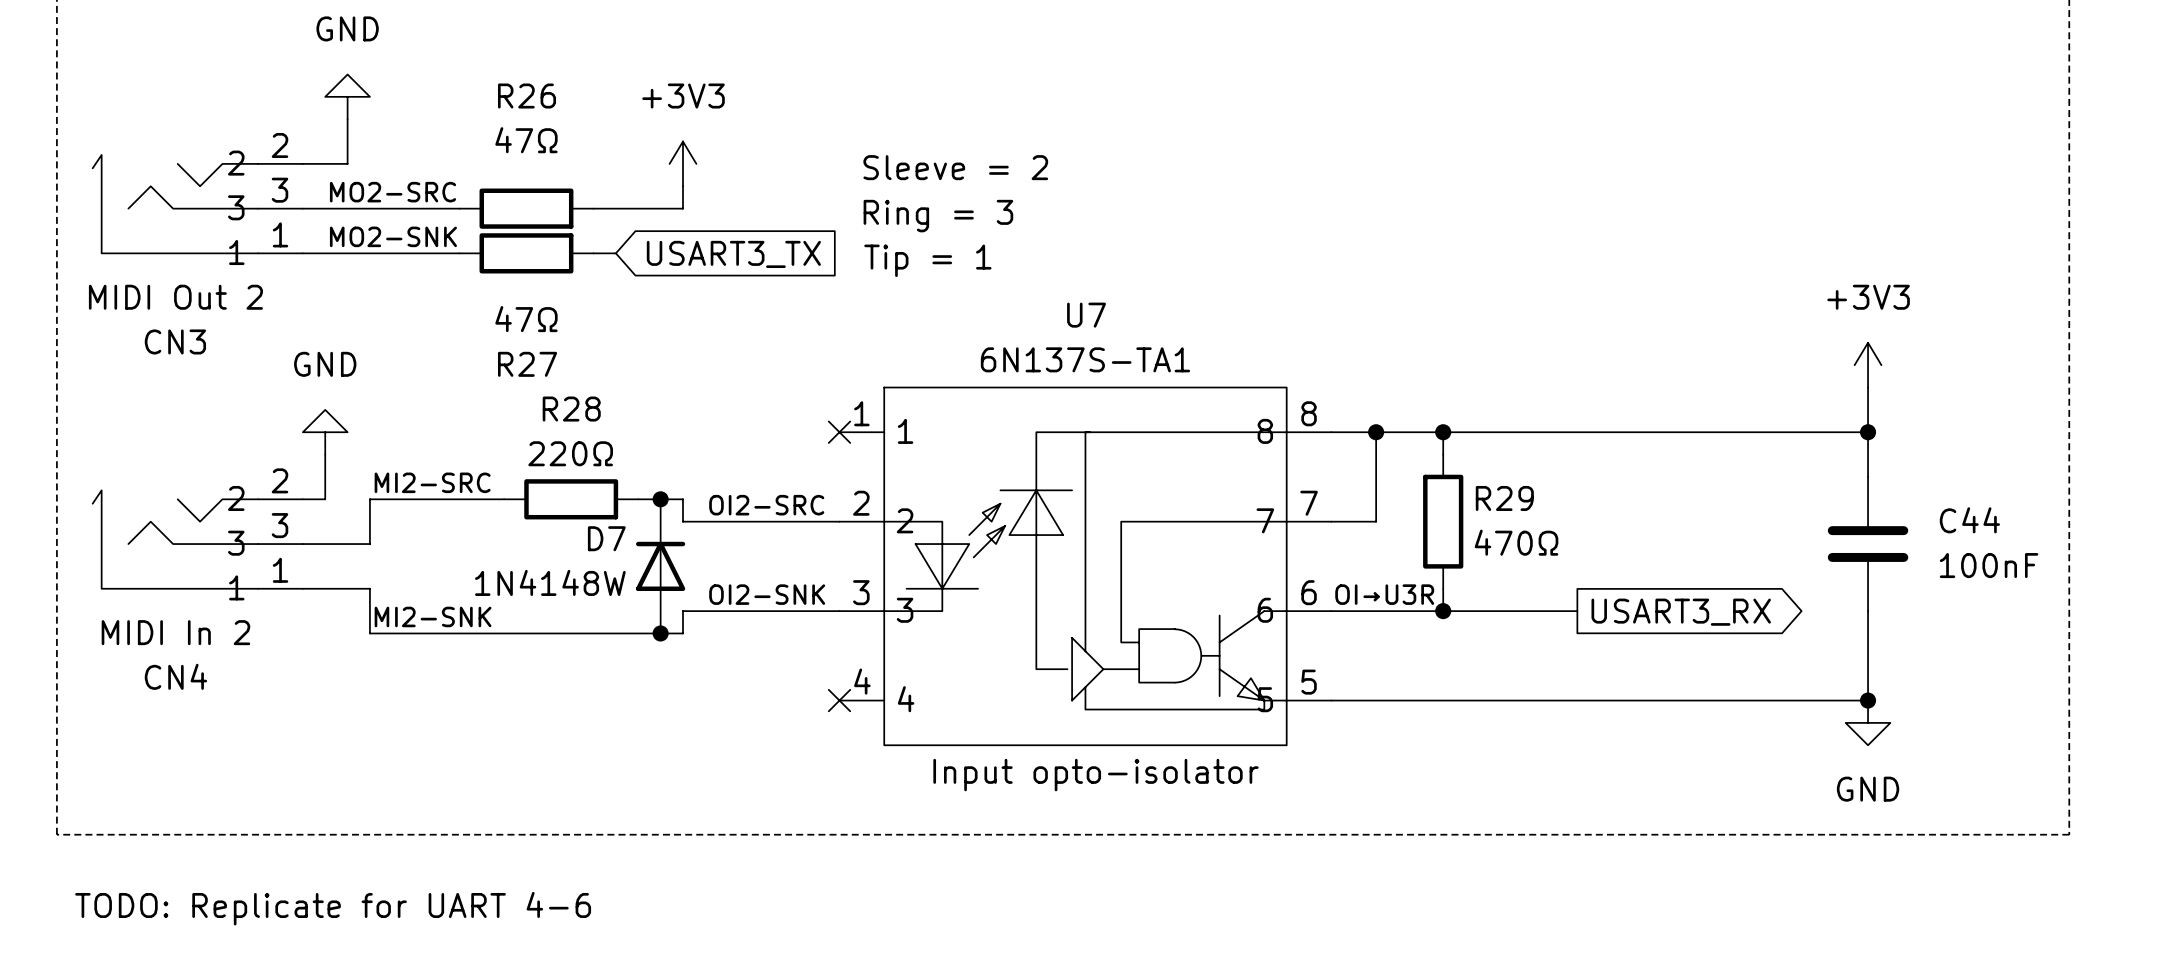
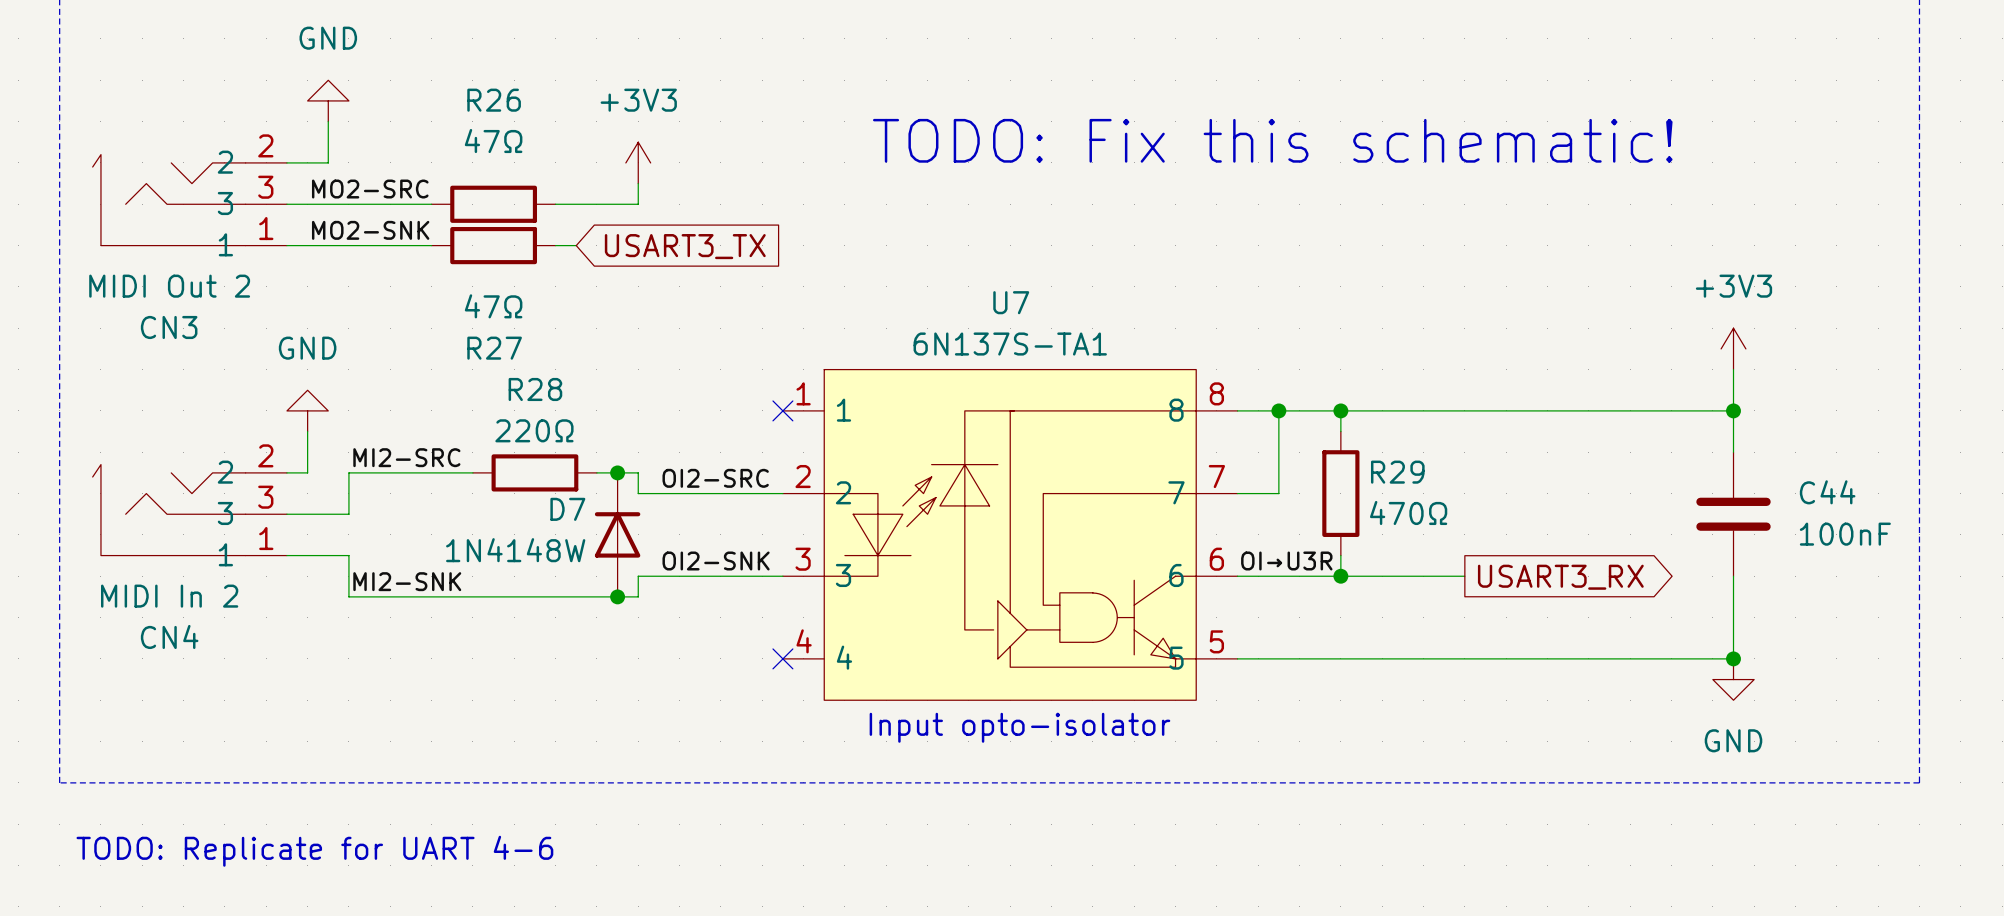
text: none -> TODO: Fix this schematic! (1272, 140)
text: Sleeve = 2 (955, 167) -> none
text: Ring = 3 (938, 216) -> none
text: Tip = 1 (927, 260) -> none

